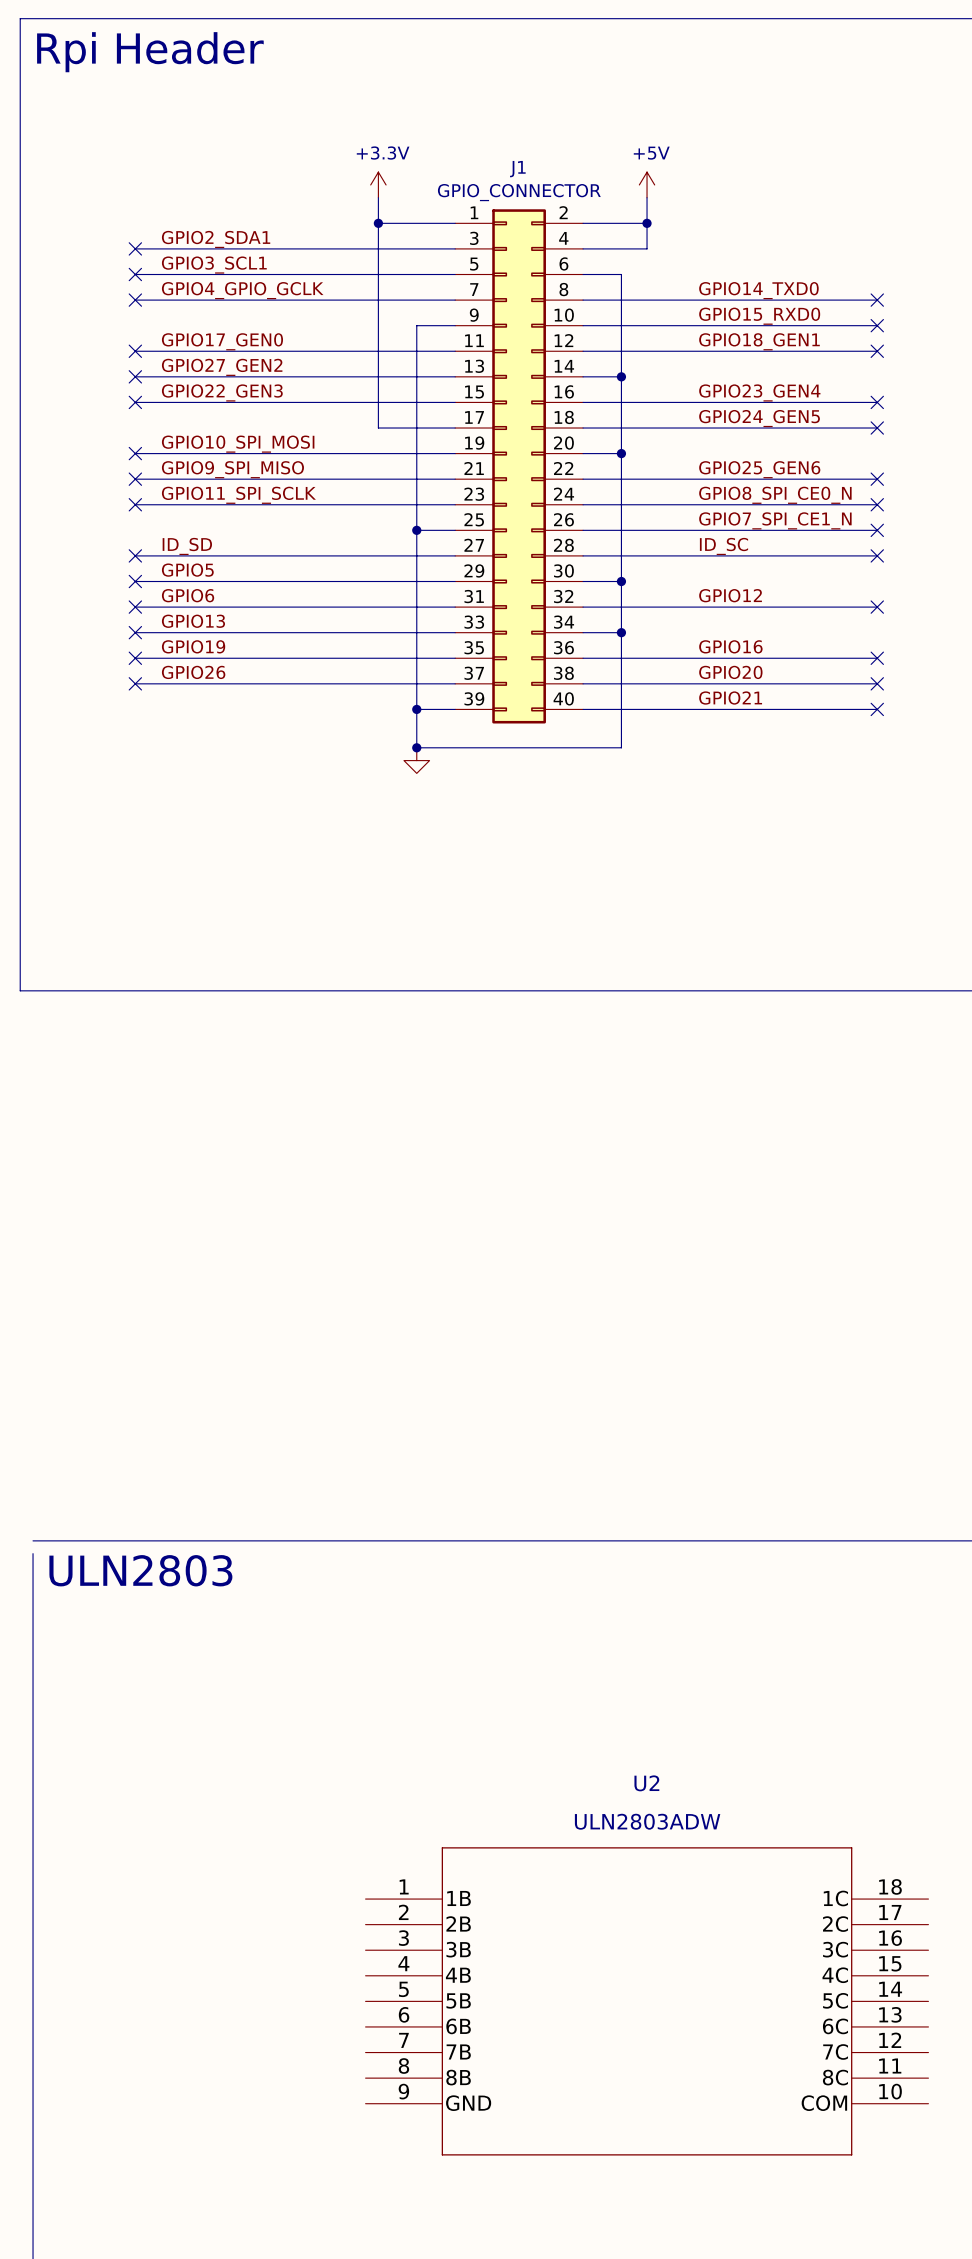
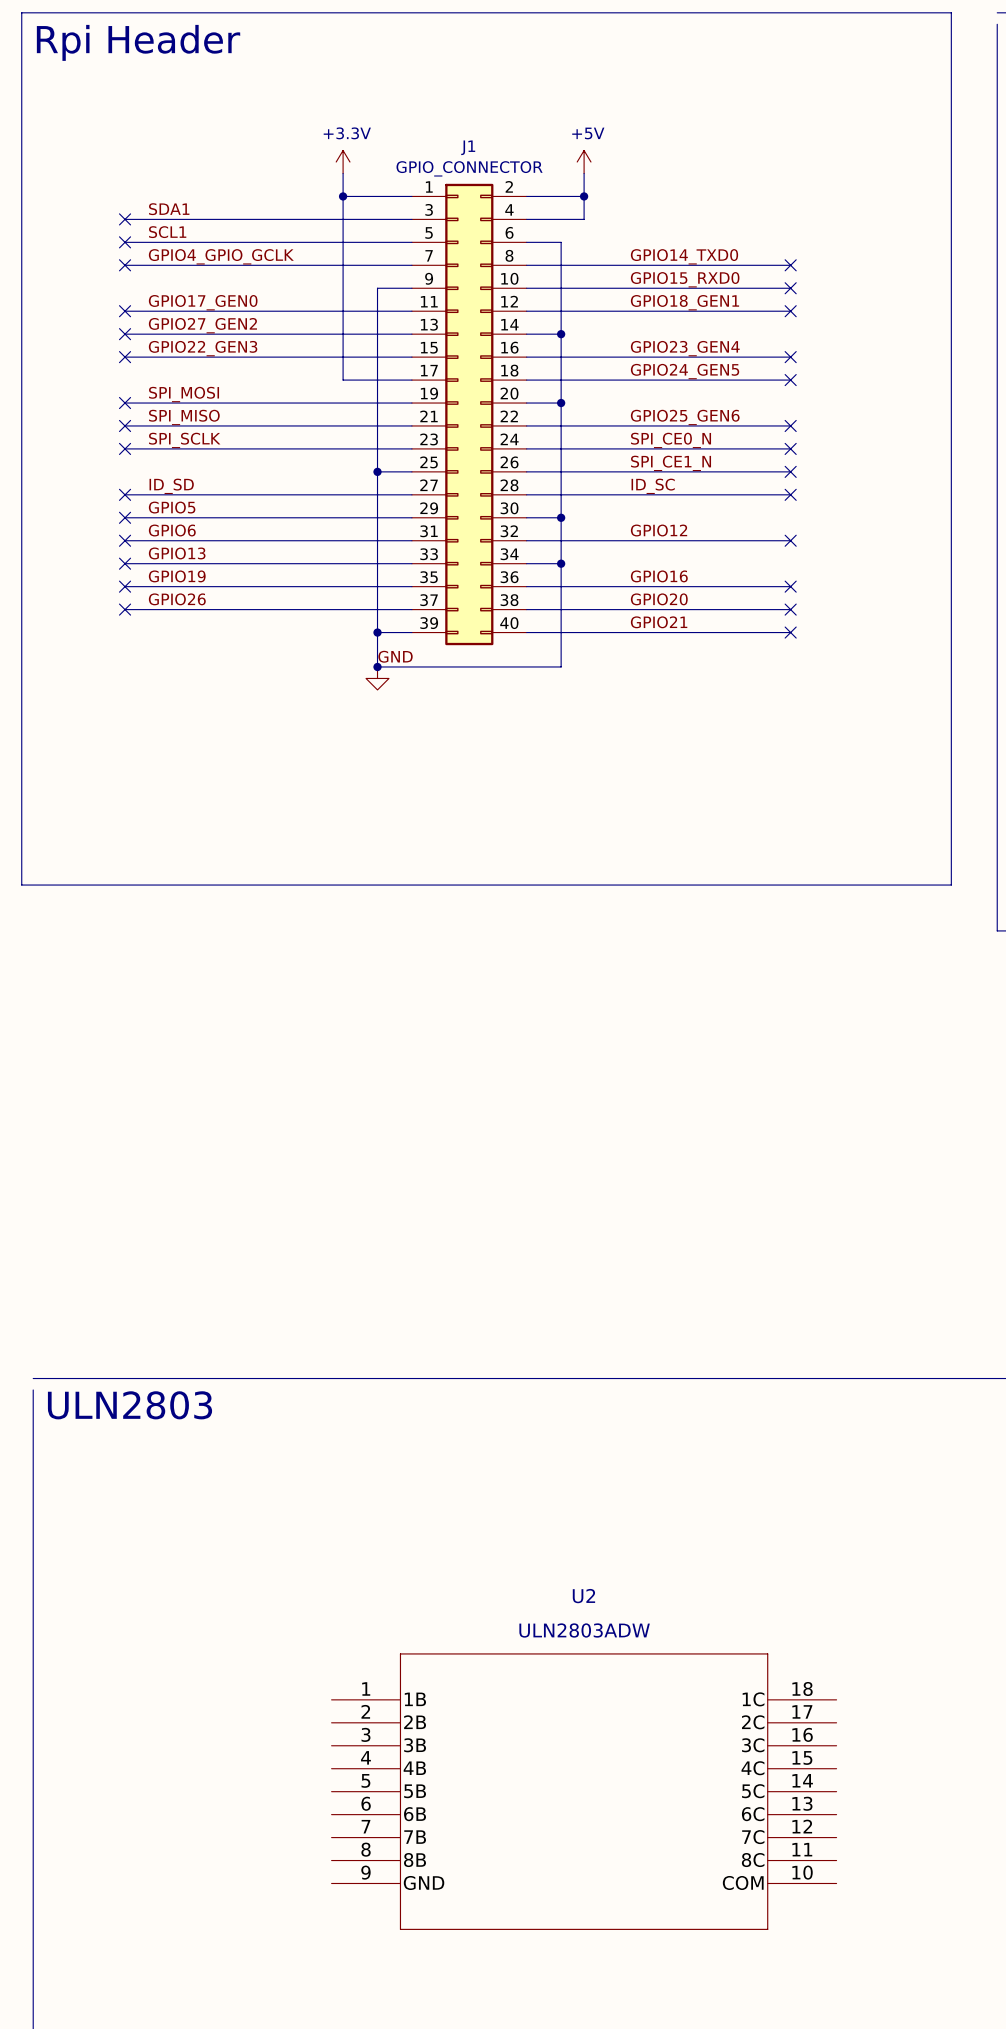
label: GPIO2_SDA1 (216, 239) -> SDA1 (169, 209)
label: GPIO3_SCL1 (214, 265) -> SCL1 (167, 232)
label: GPIO10_SPI_MOSI (238, 444) -> SPI_MOSI (184, 394)
label: GPIO9_SPI_MISO (232, 469) -> SPI_MISO (184, 417)
label: GPIO11_SPI_SCLK (238, 495) -> SPI_SCLK (184, 440)
label: GPIO8_SPI_CE0_N (775, 495) -> SPI_CE0_N (671, 440)
label: GPIO7_SPI_CE1_N (775, 520) -> SPI_CE1_N (671, 463)
label: none -> GND (395, 656)

